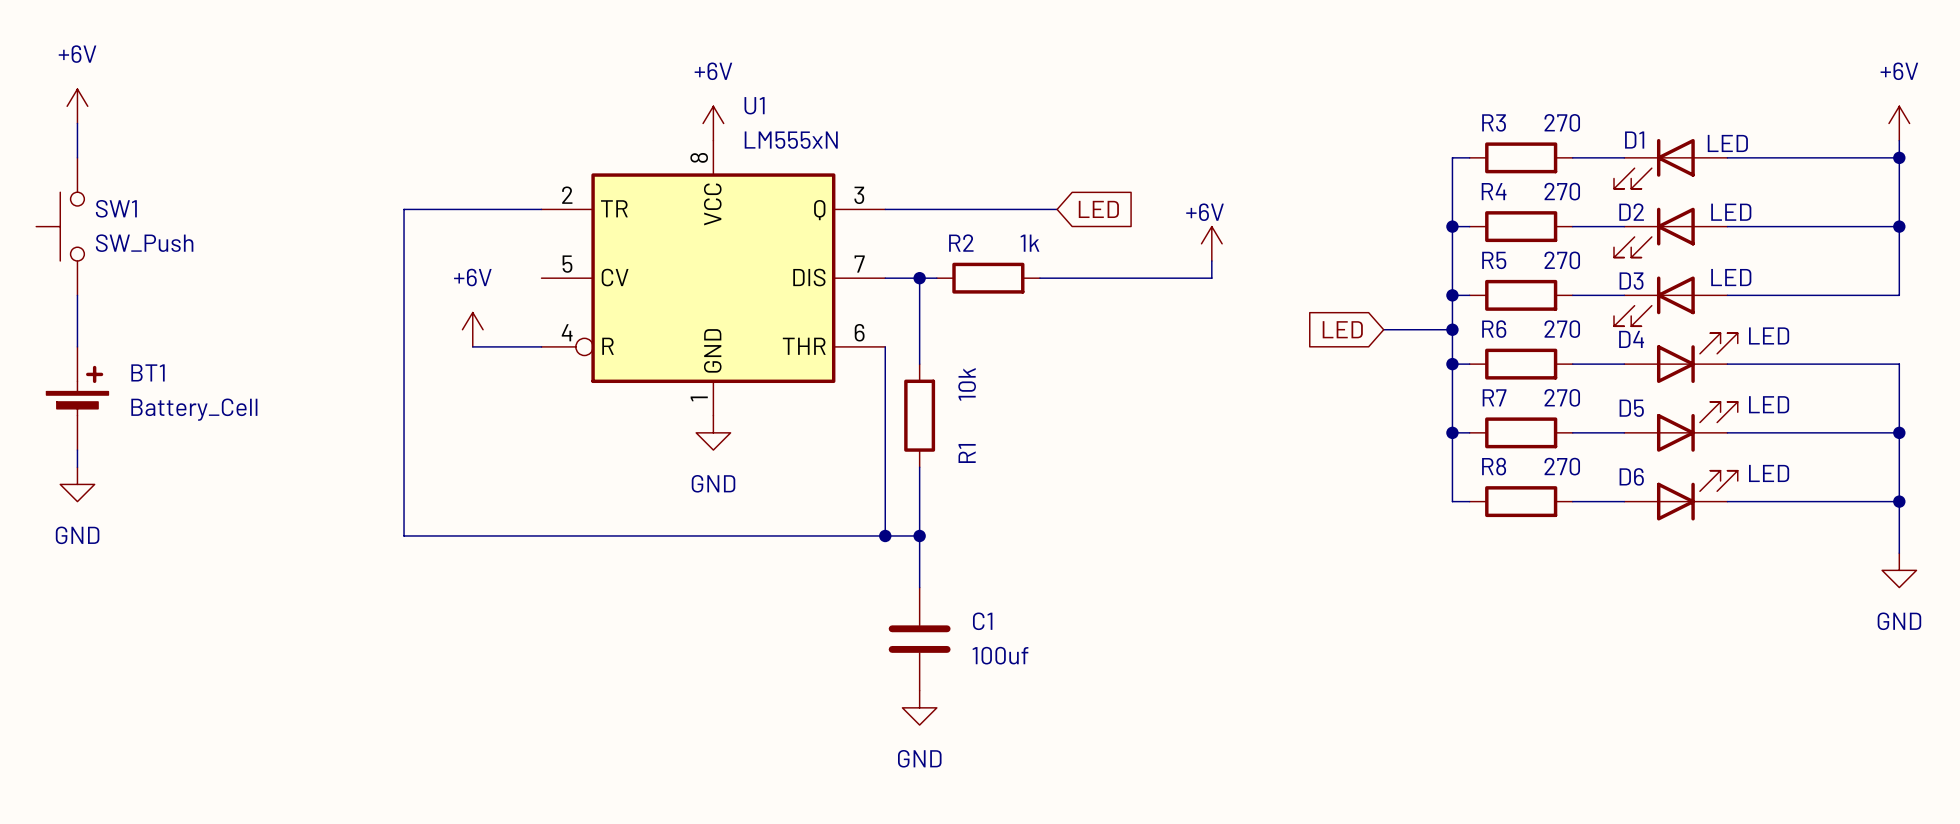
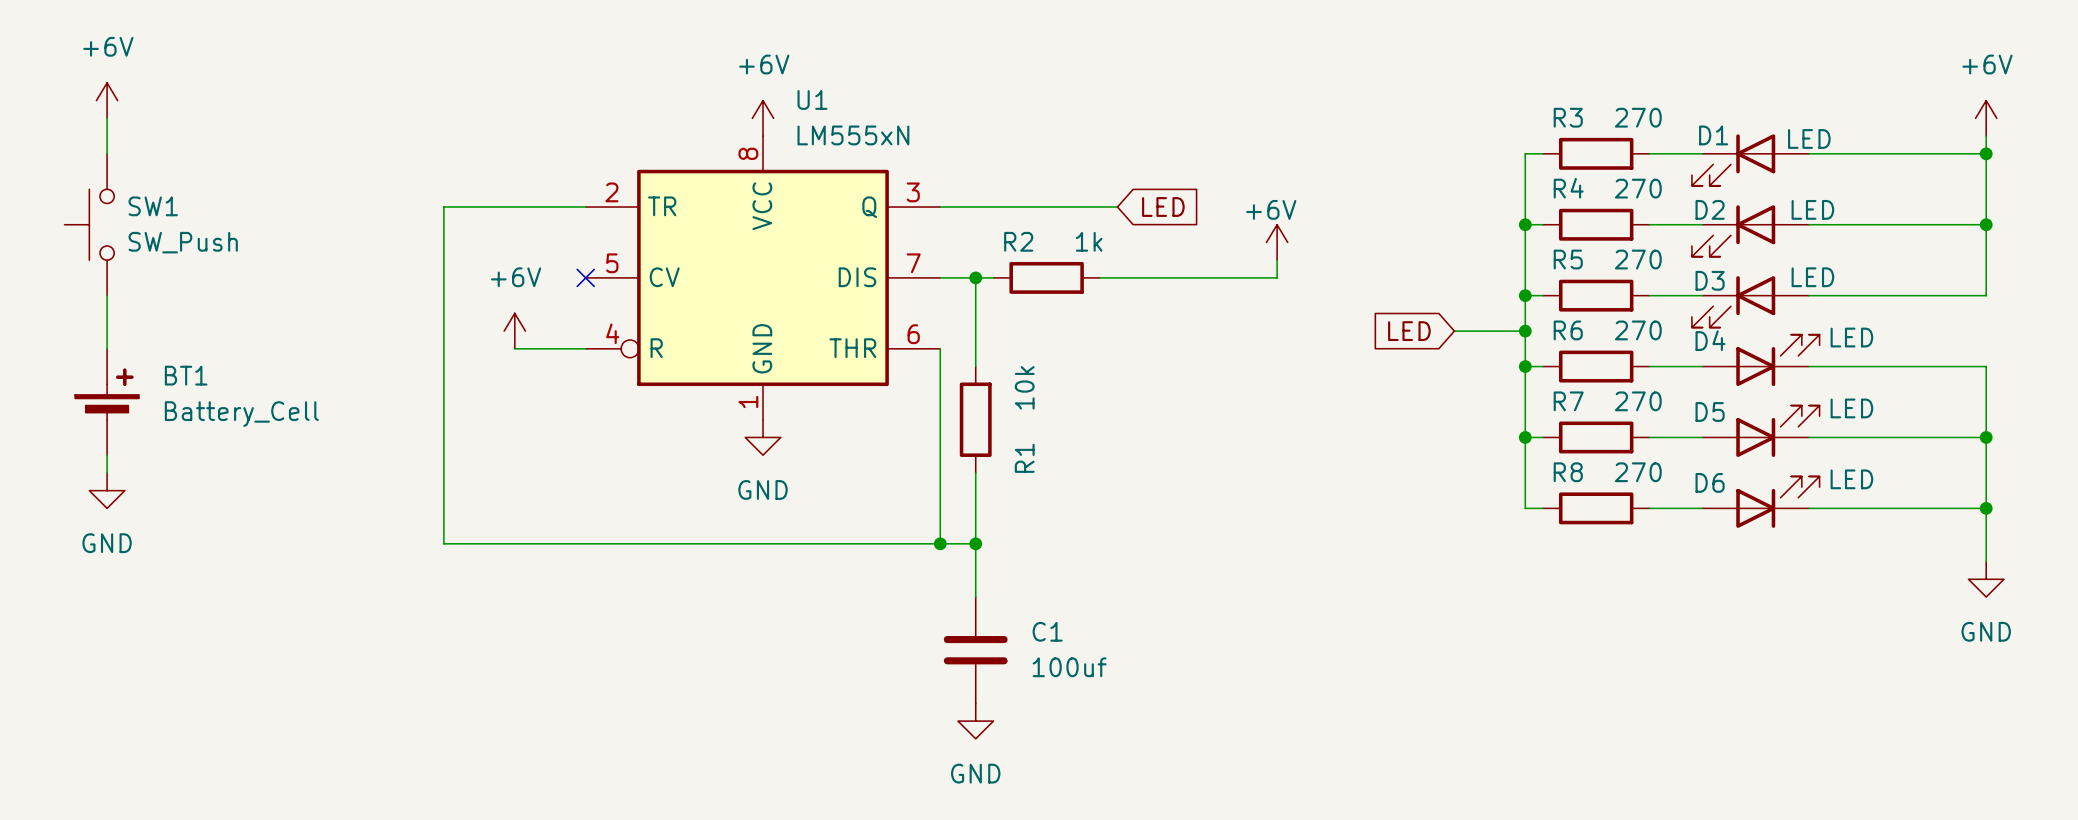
no-connect mark: none -> (585, 277)

